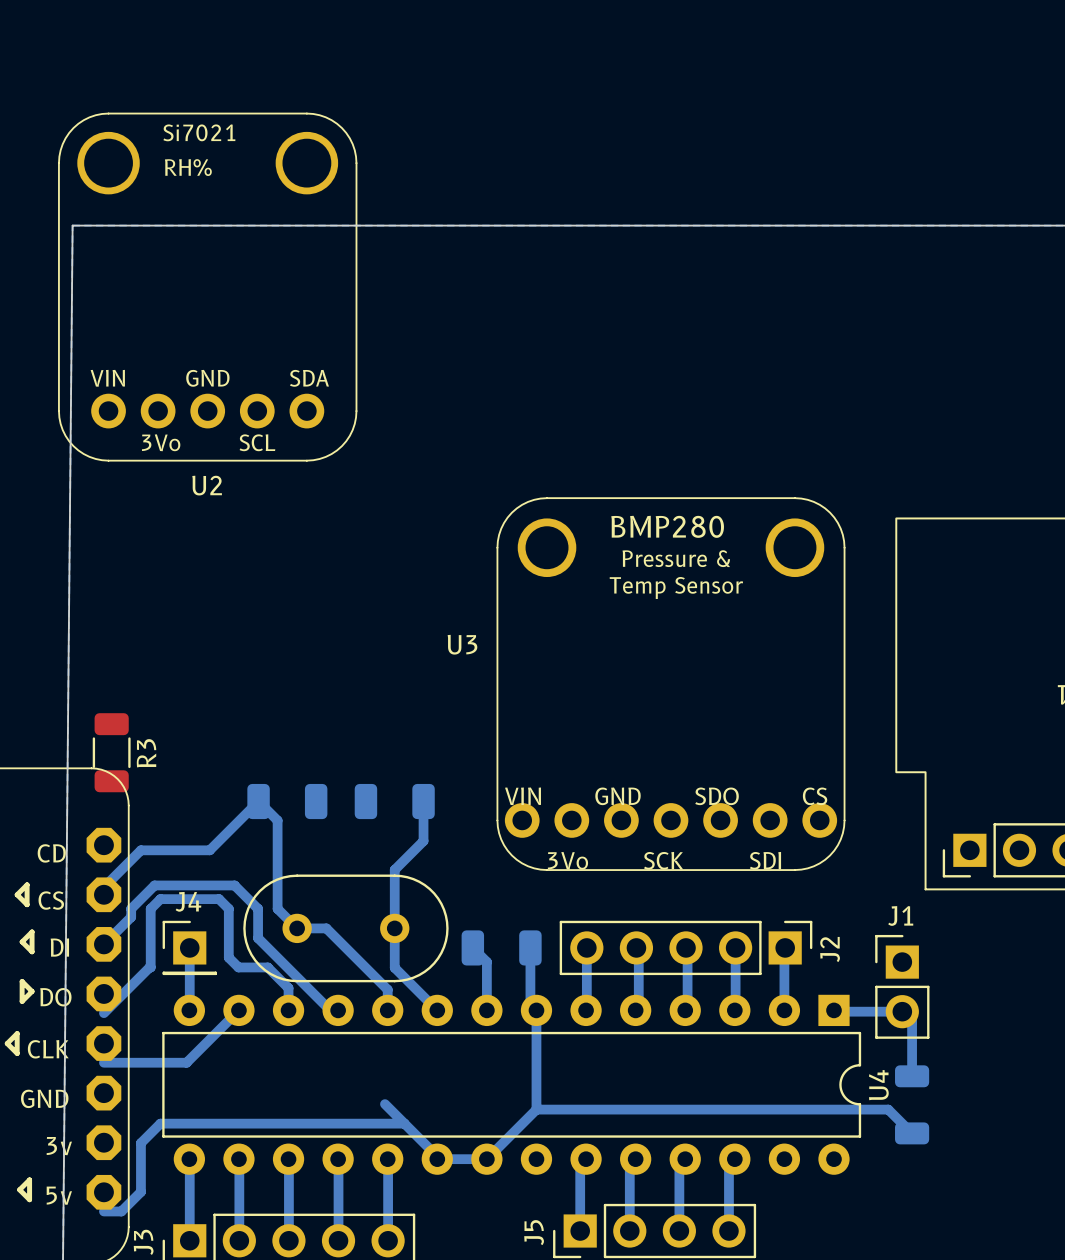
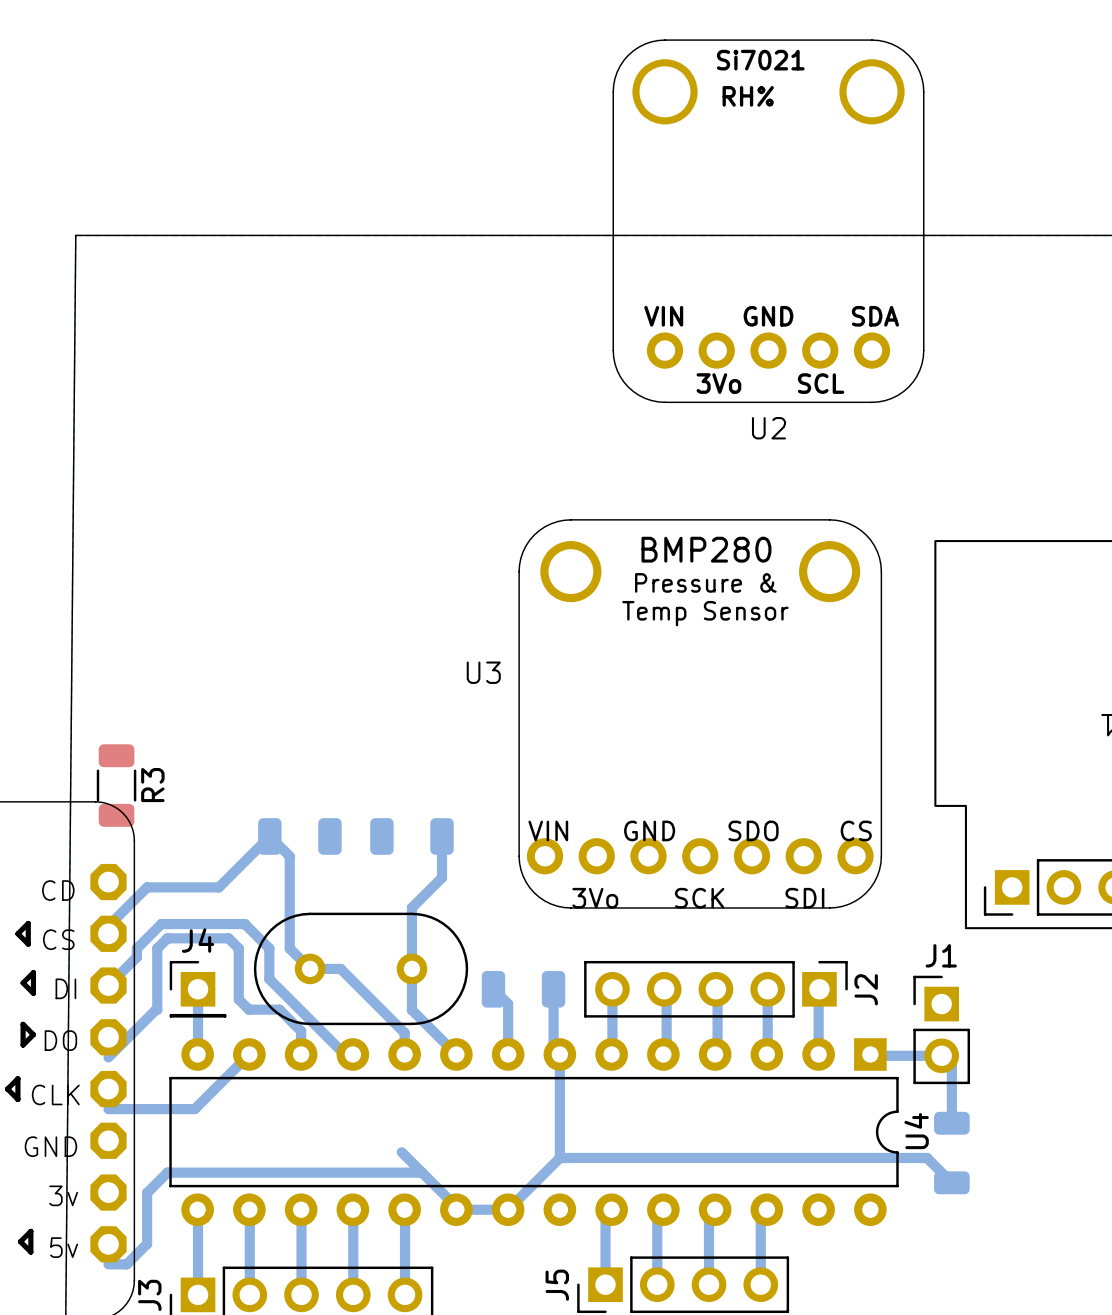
U2 position: (207, 287) -> (768, 221)

